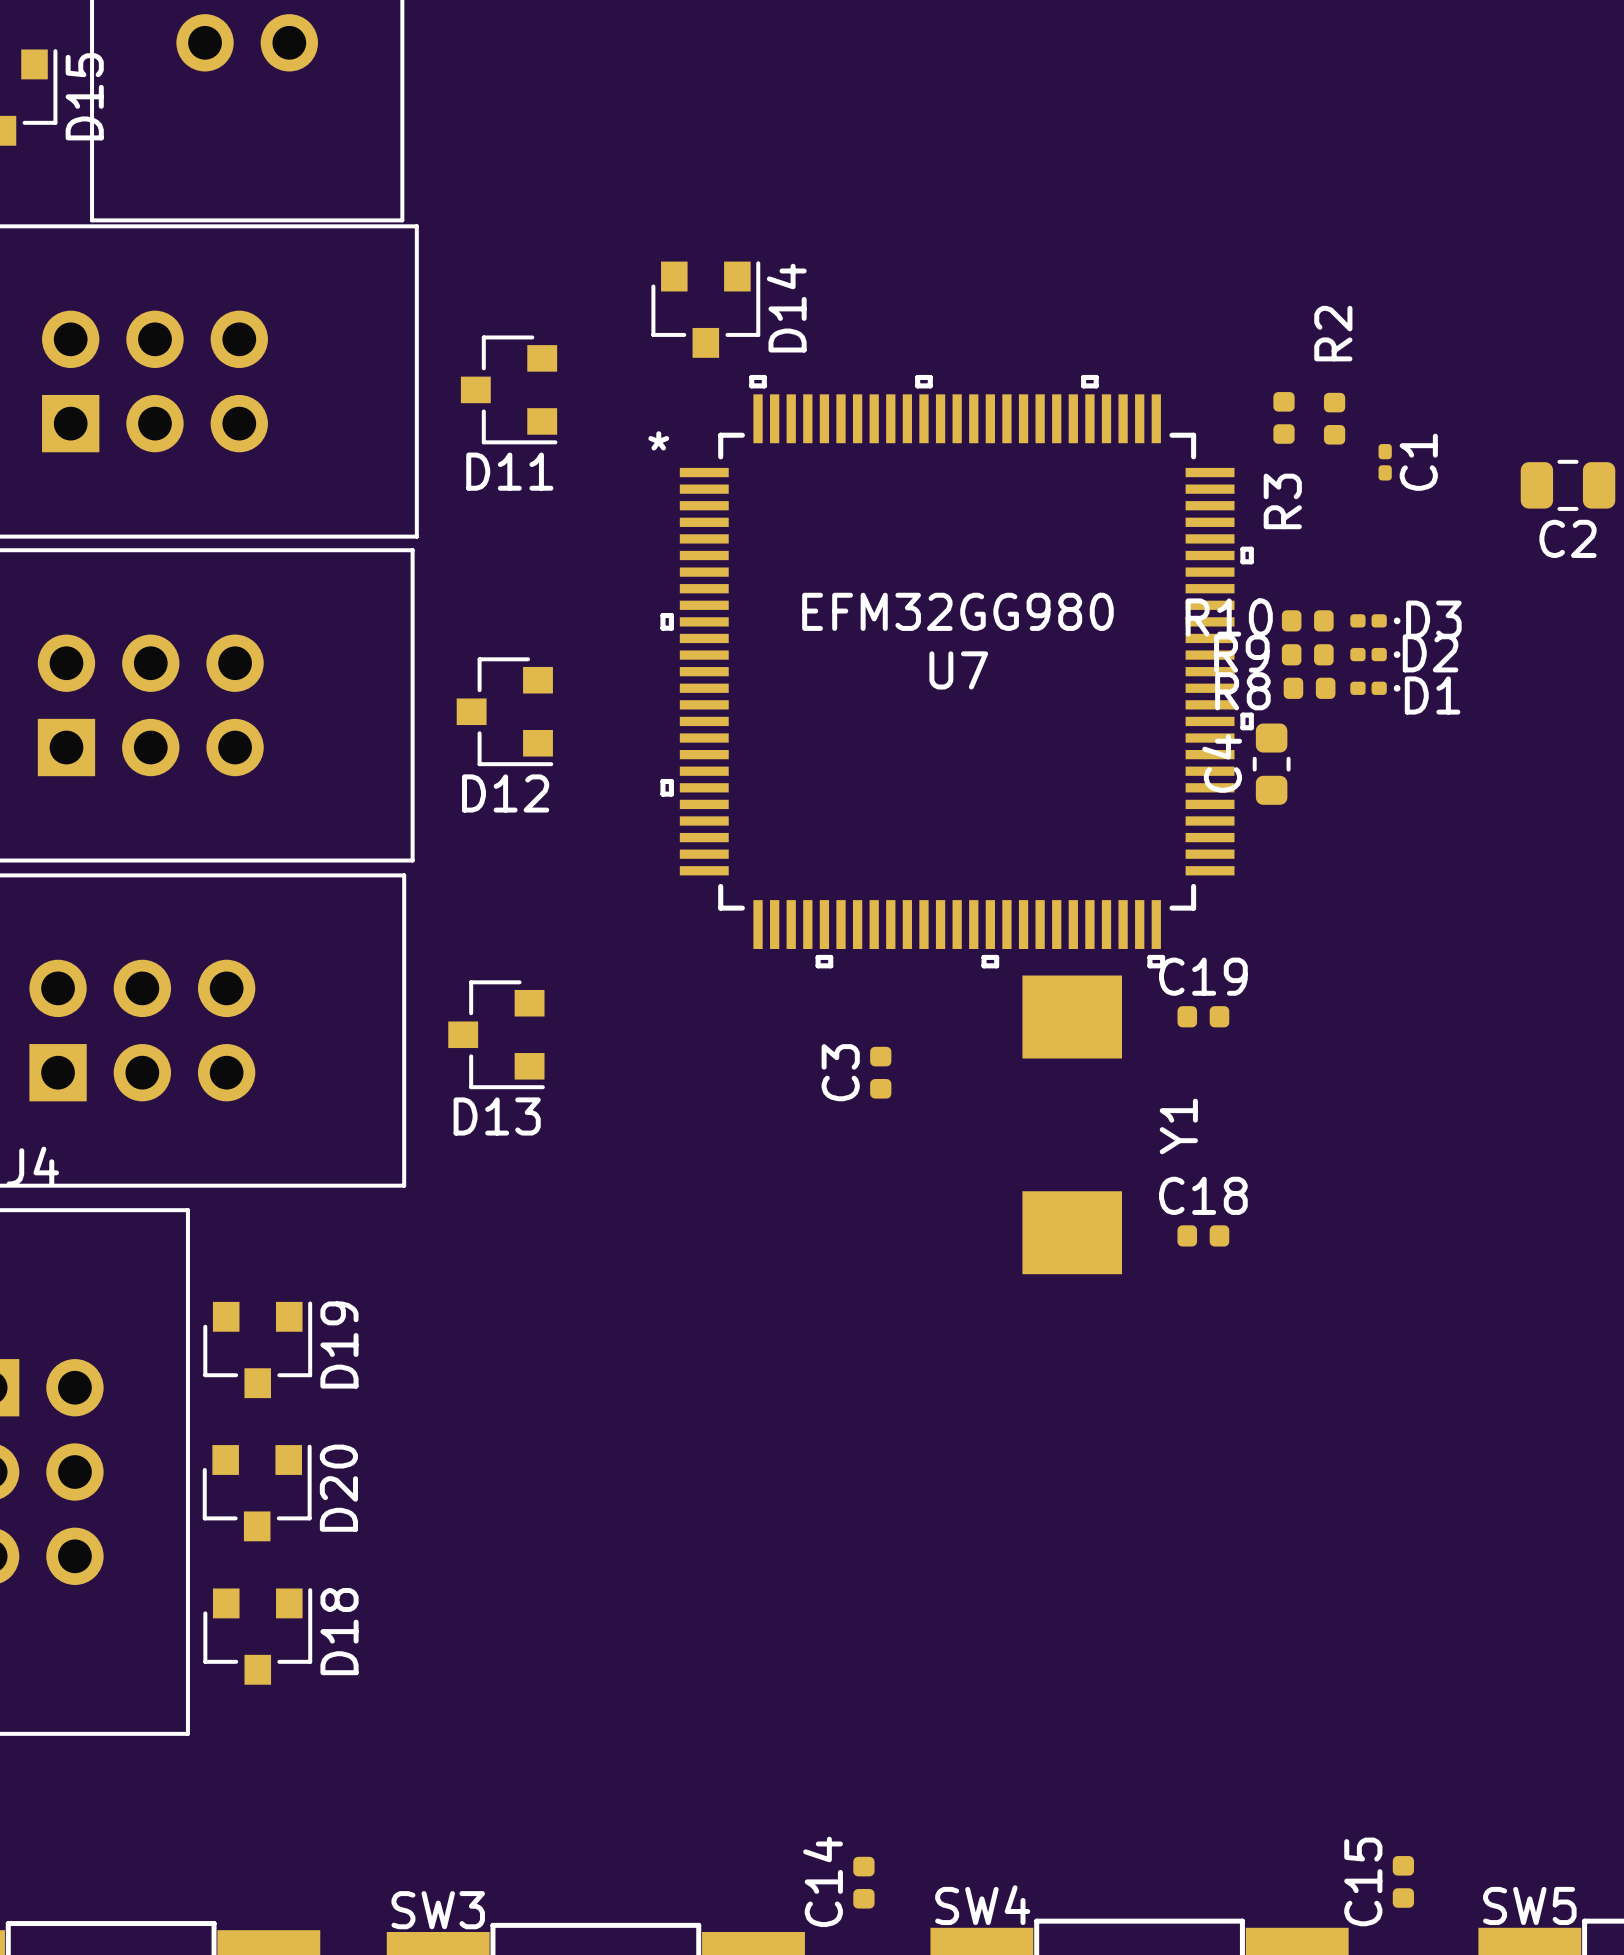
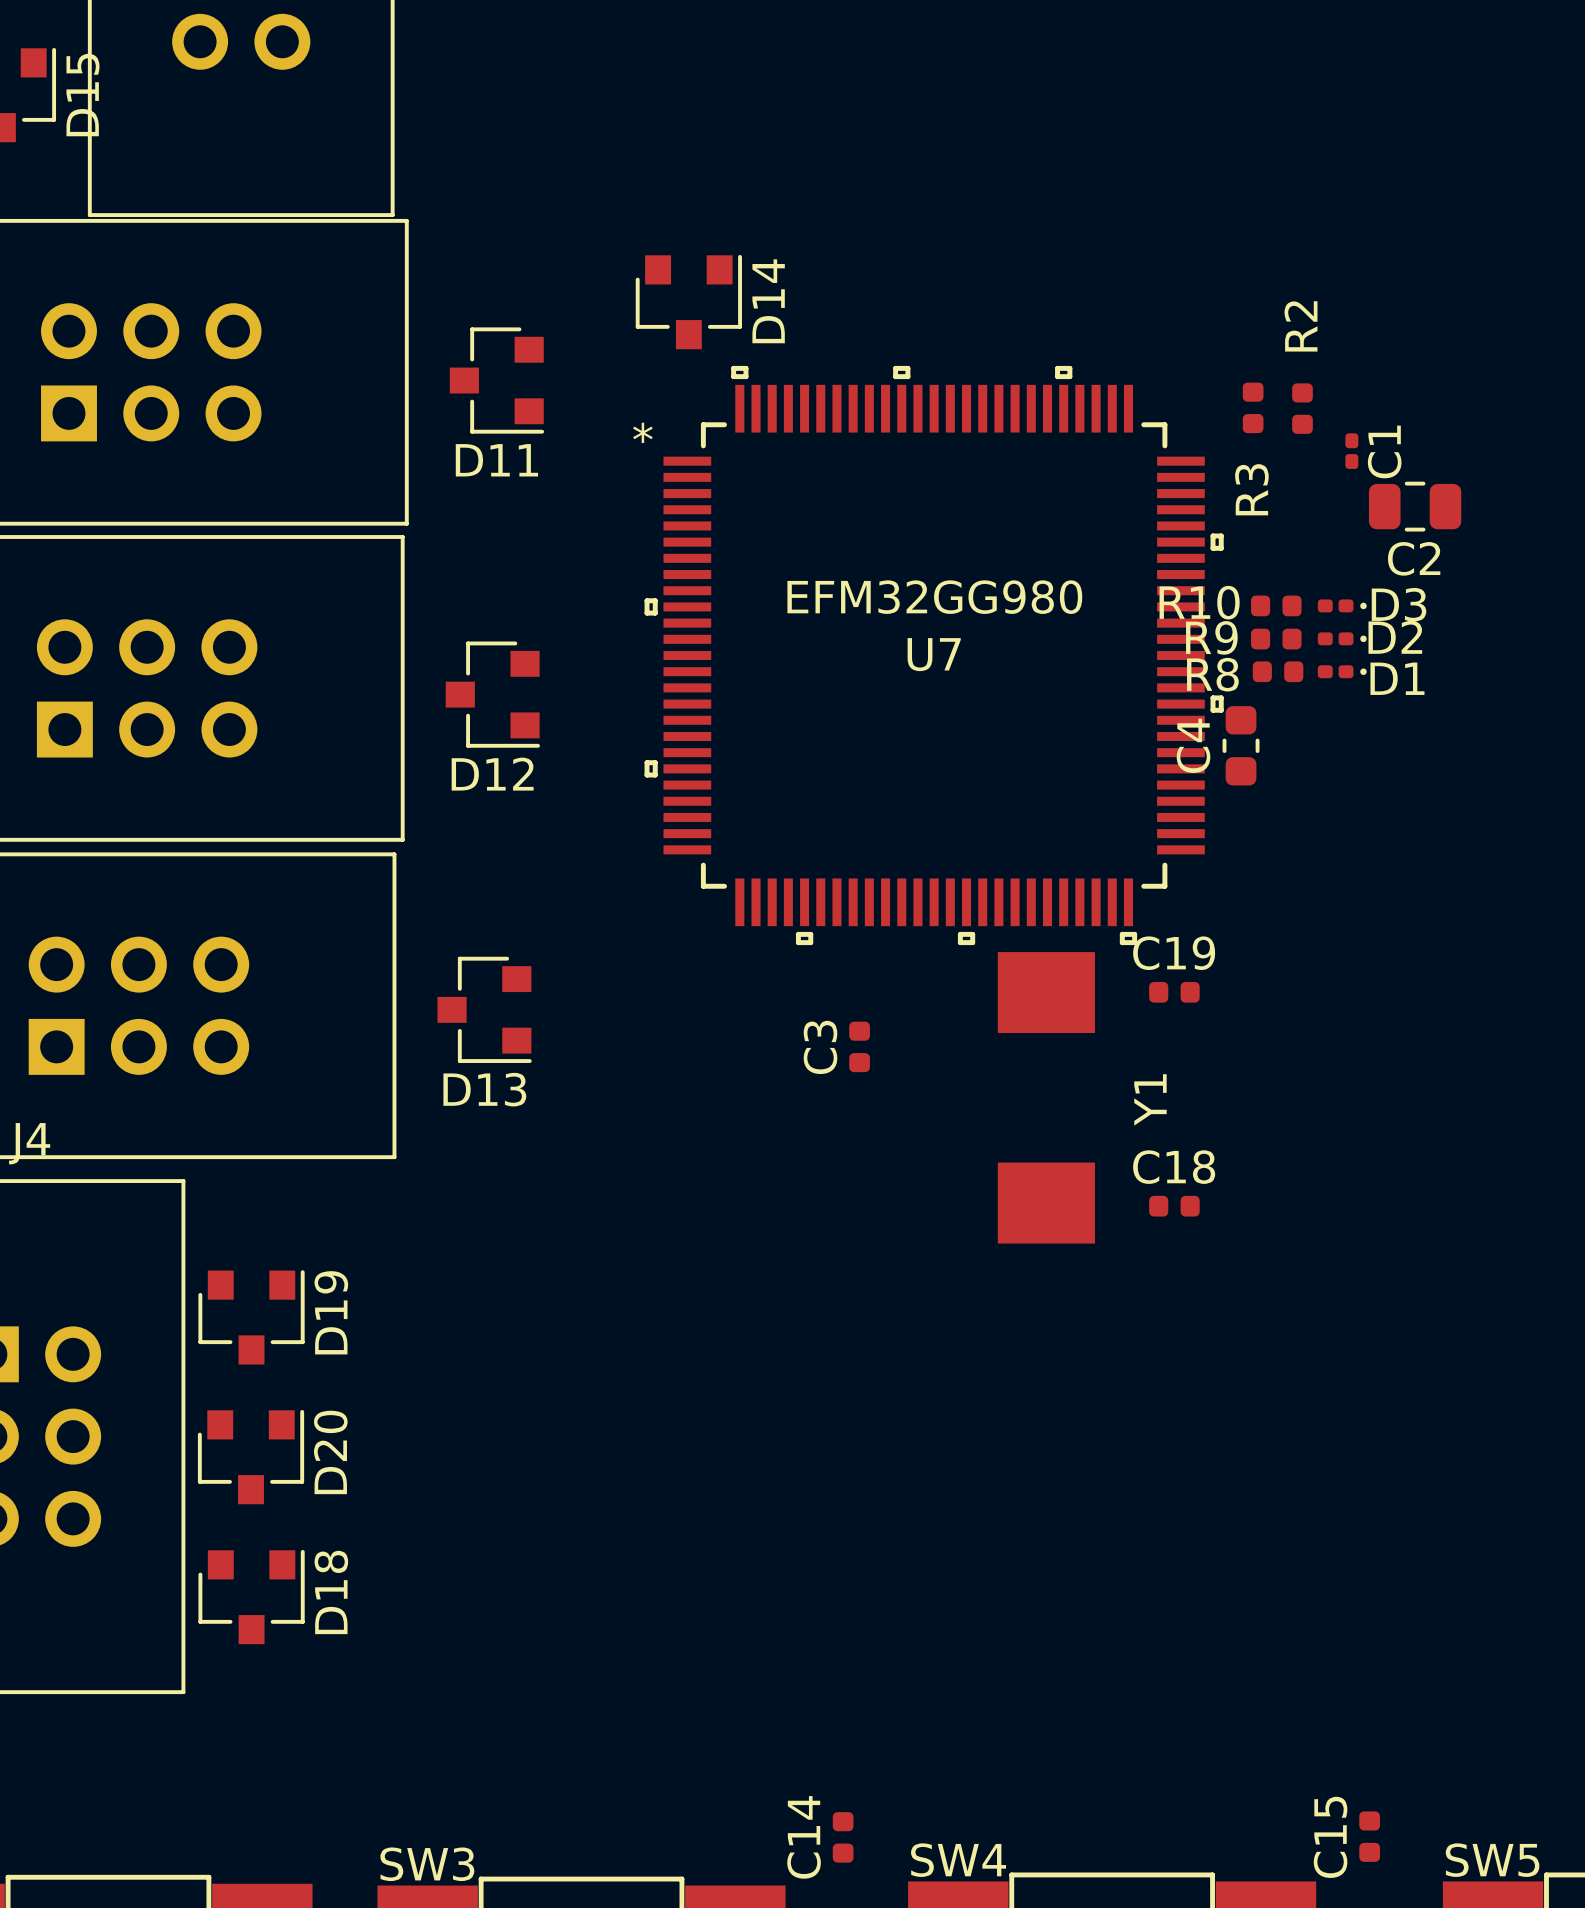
C2 position: (1568, 485) -> (1415, 506)

